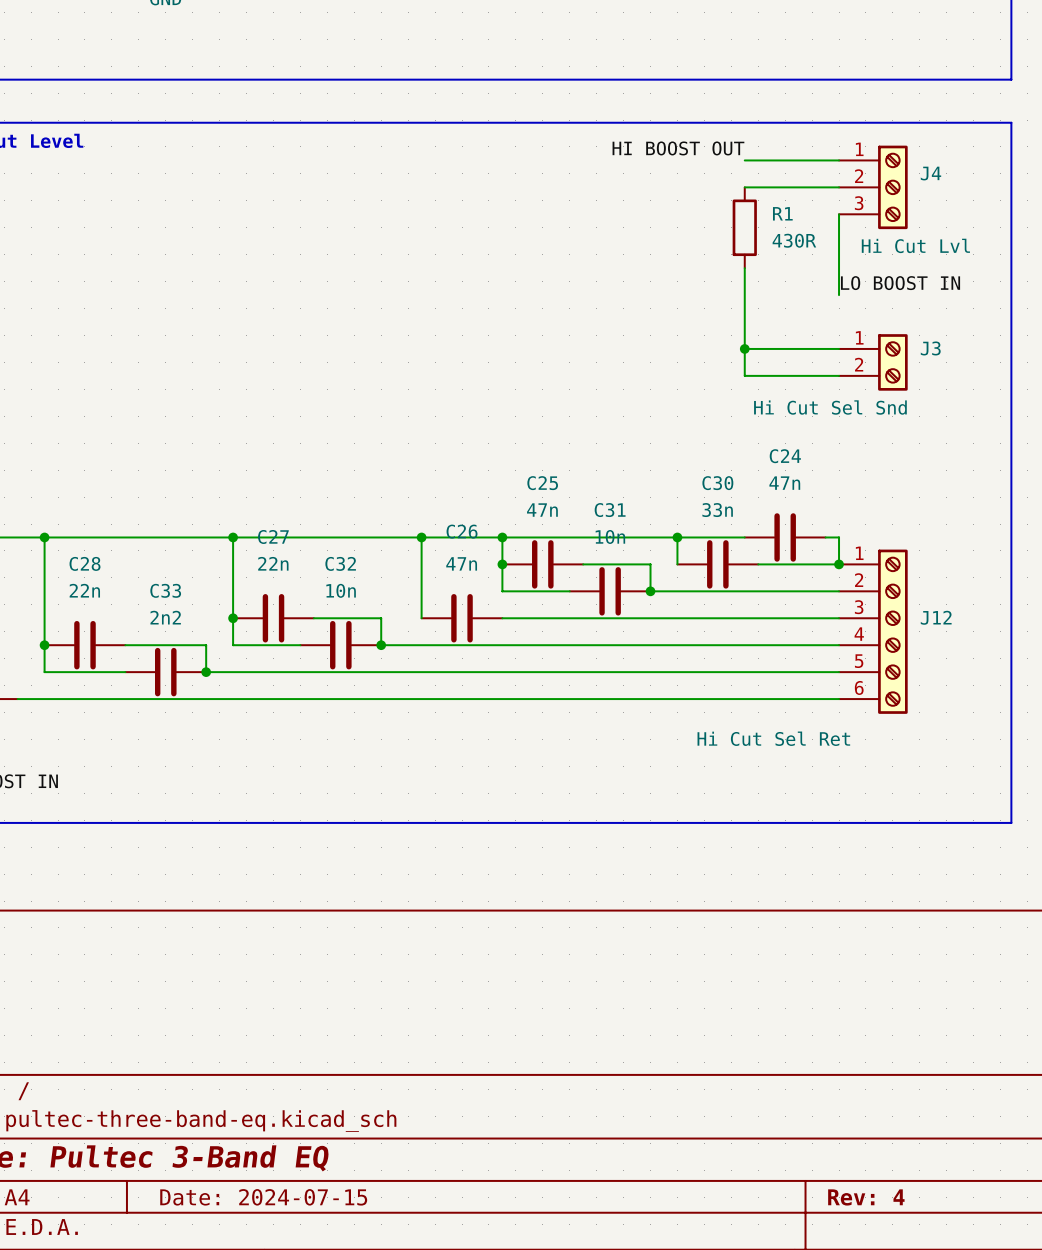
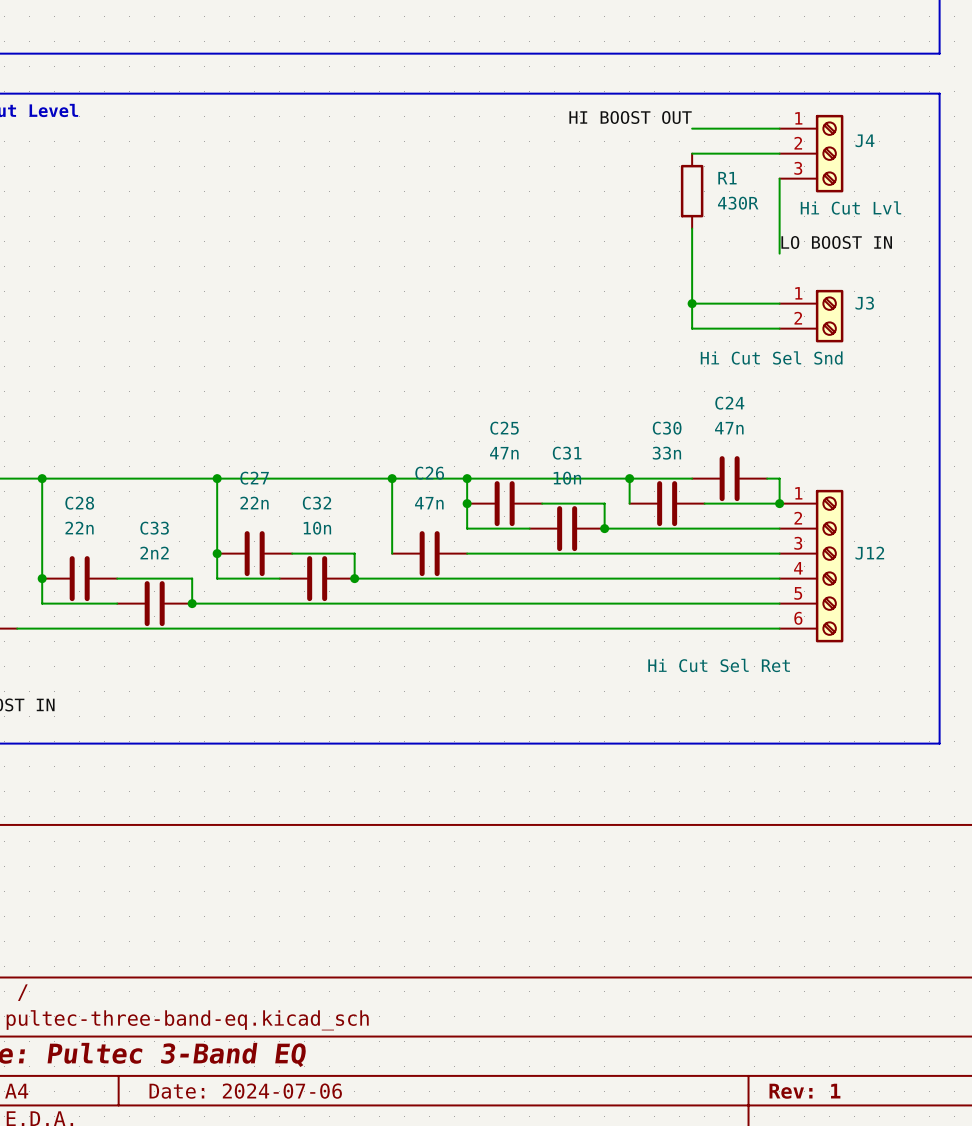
title block: Date: 2024-07-15 (263, 1197) -> Date: 2024-07-06 (245, 1091)
title block: Rev: 4 (866, 1197) -> Rev: 1 (804, 1091)

